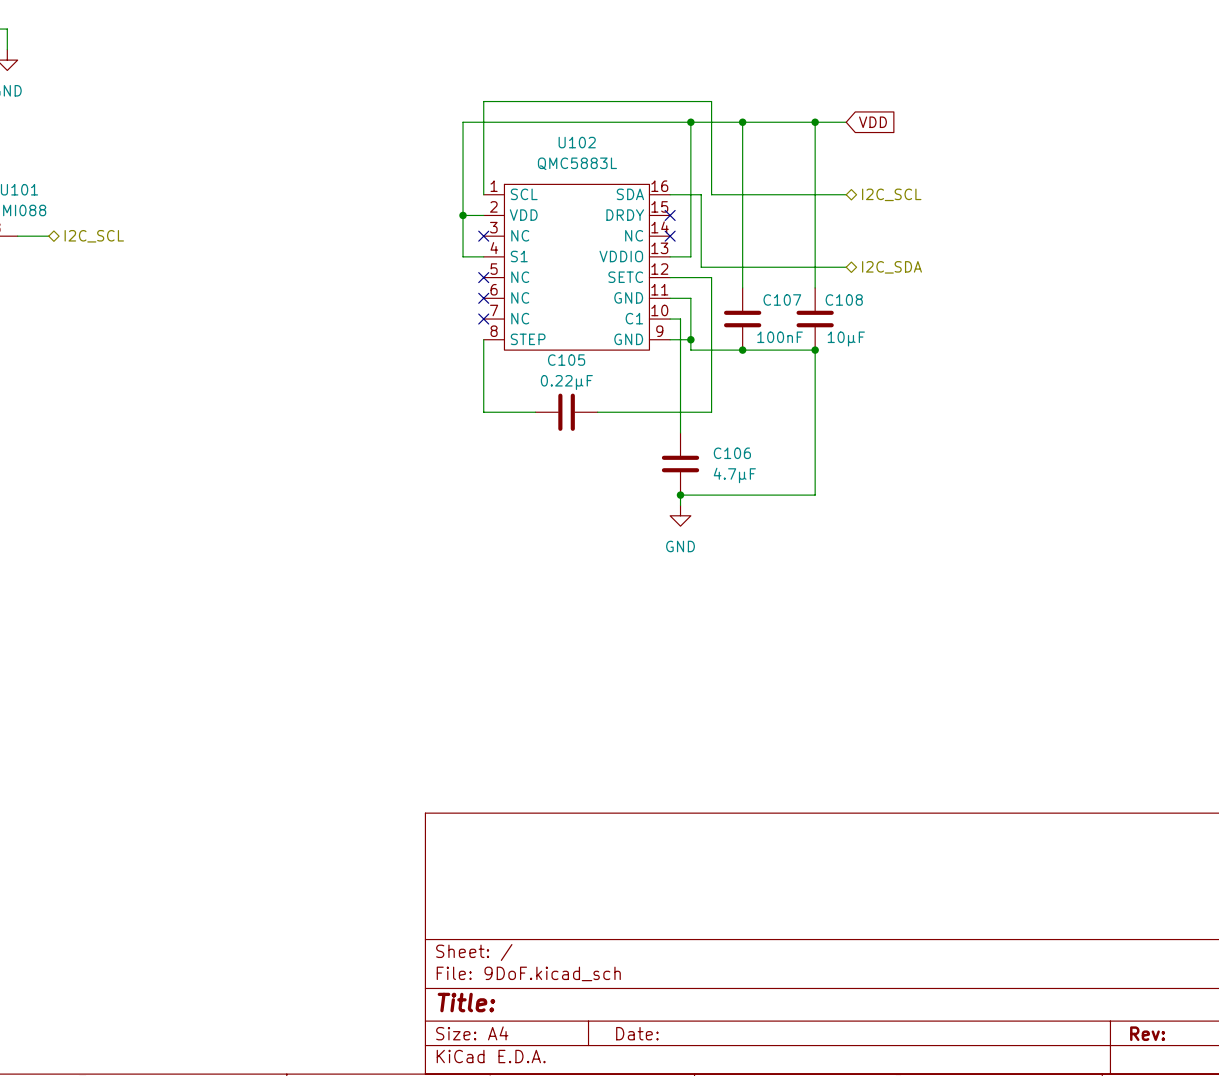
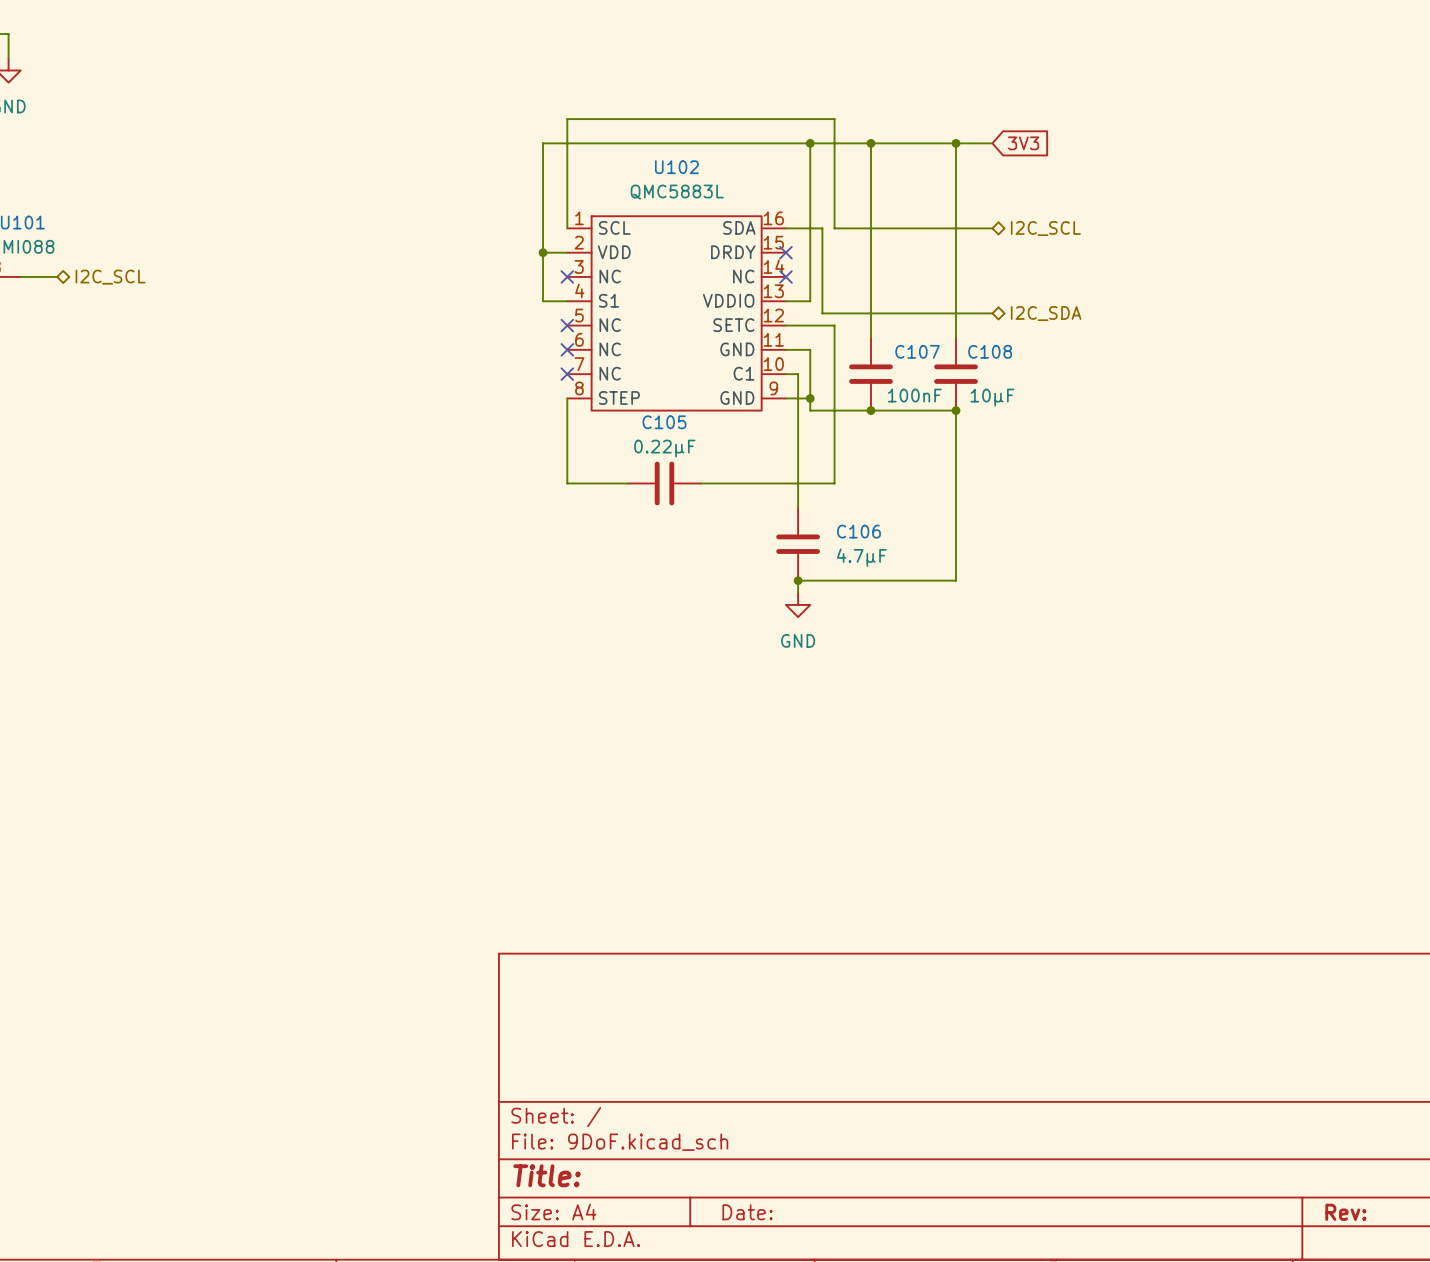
global label: VDD (872, 122) -> 3V3 (1023, 143)

